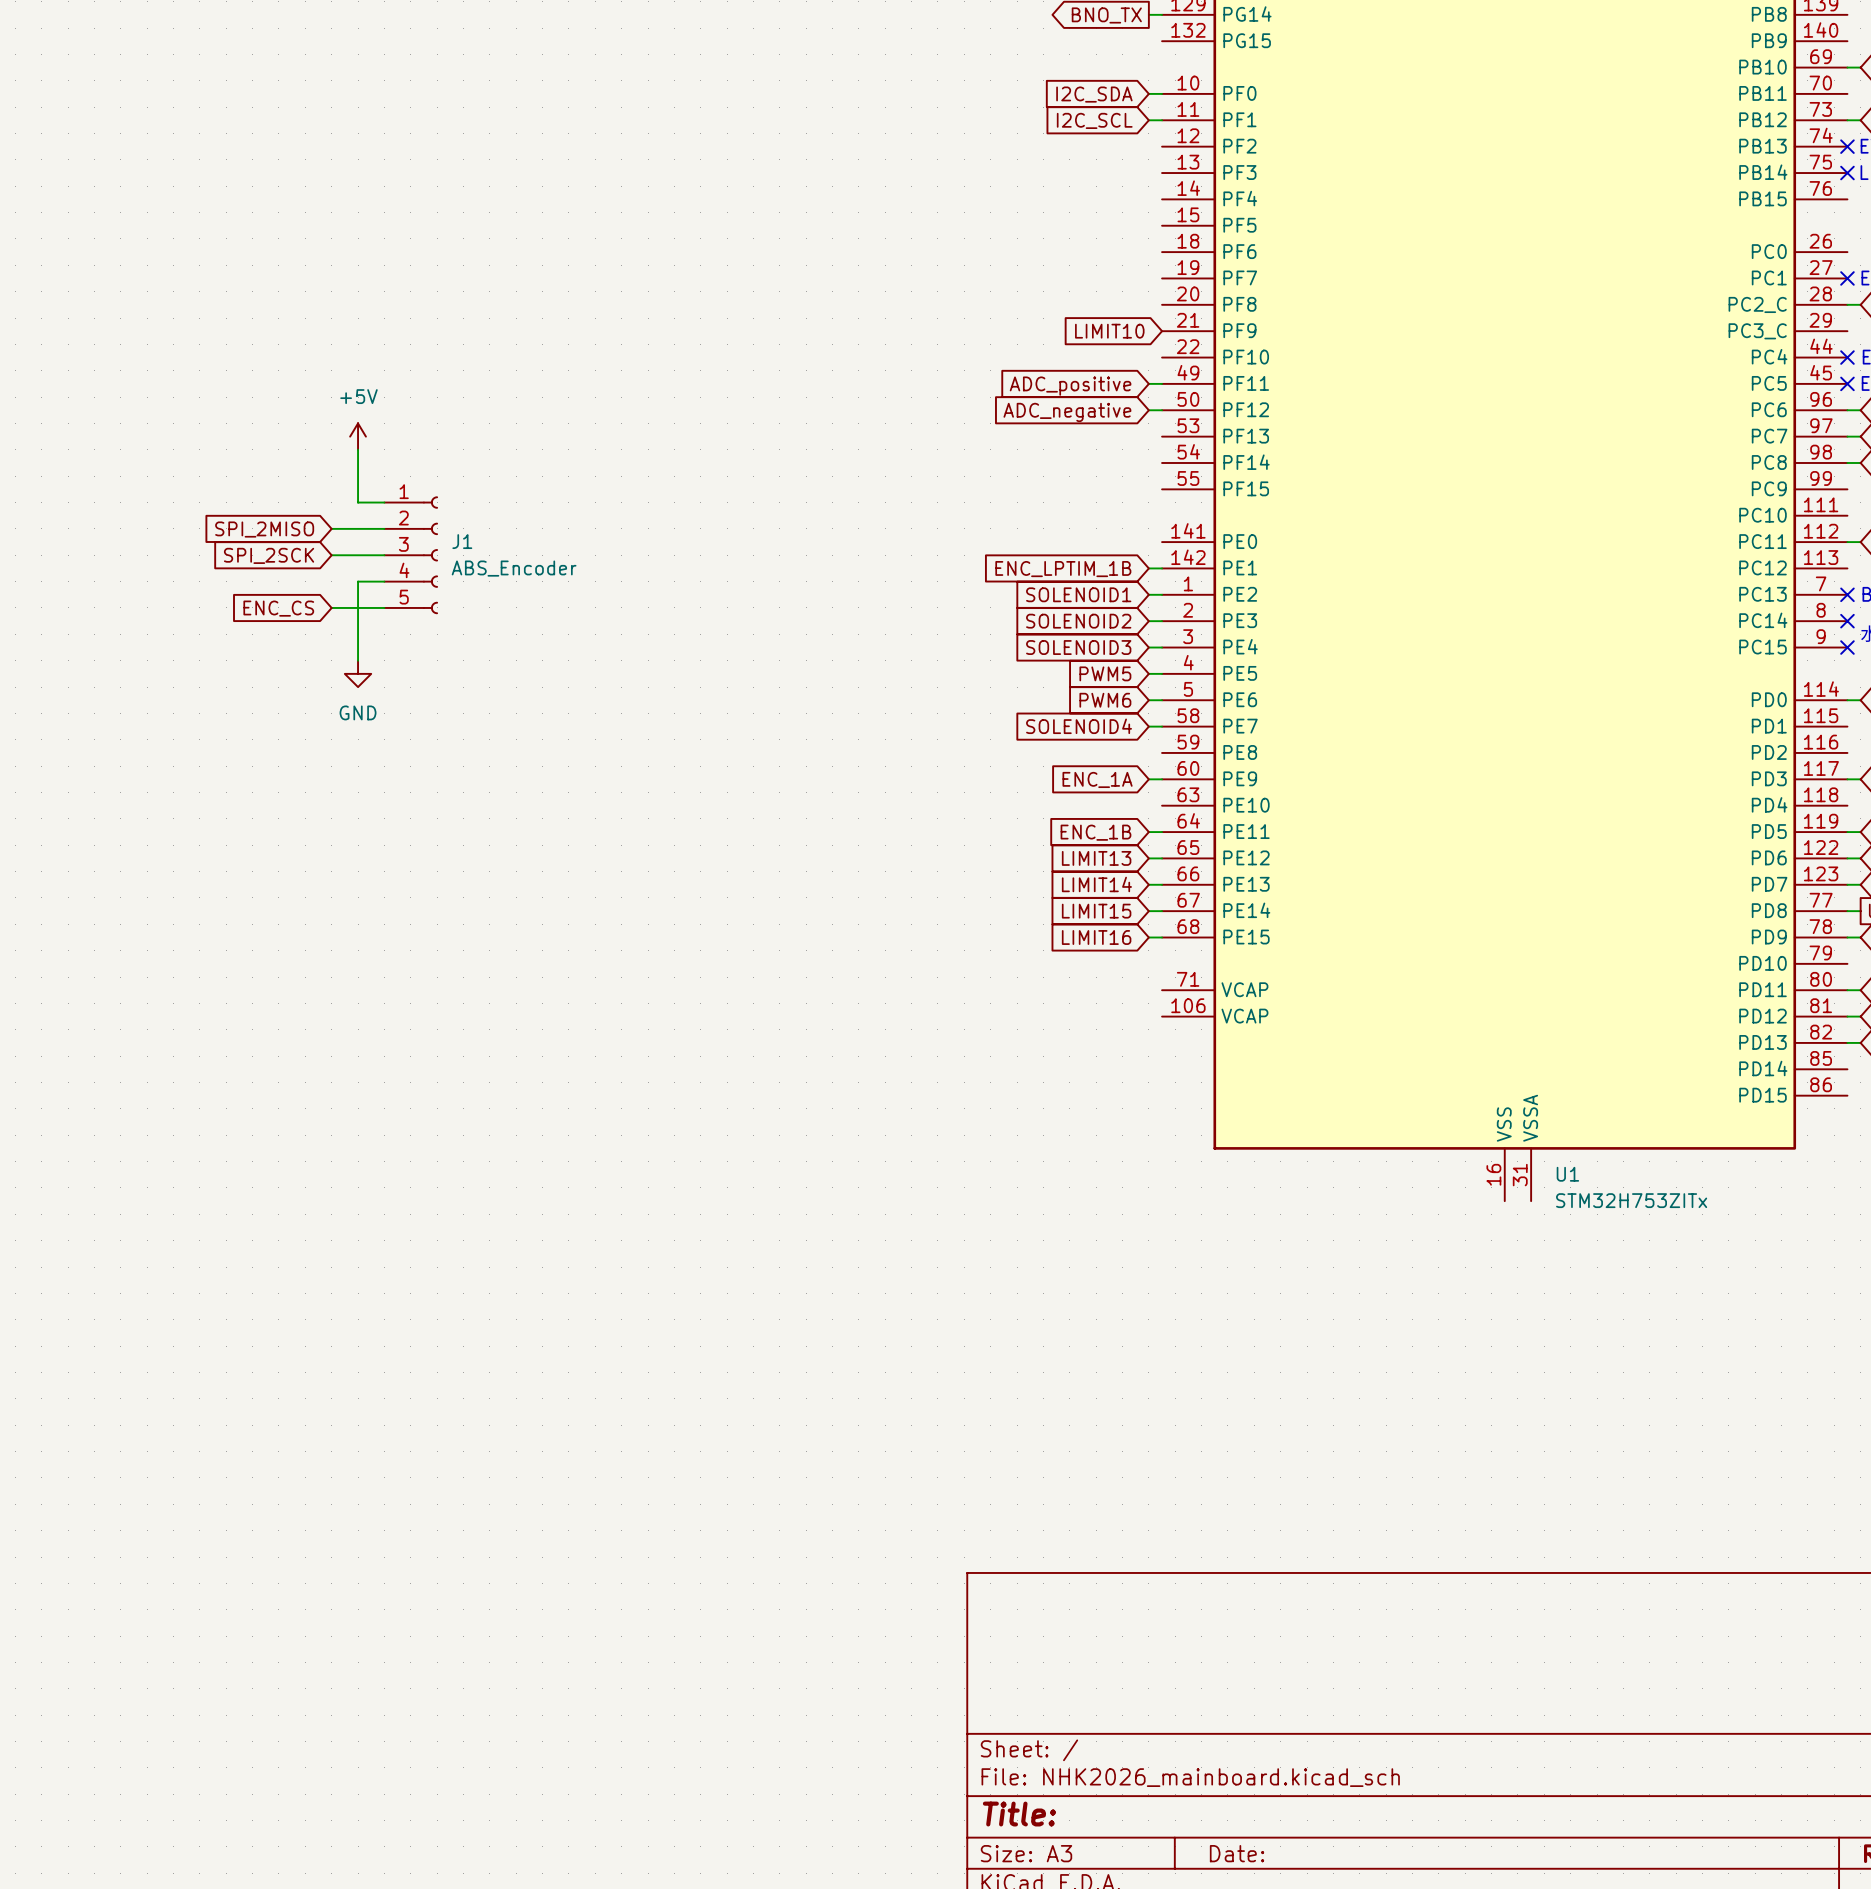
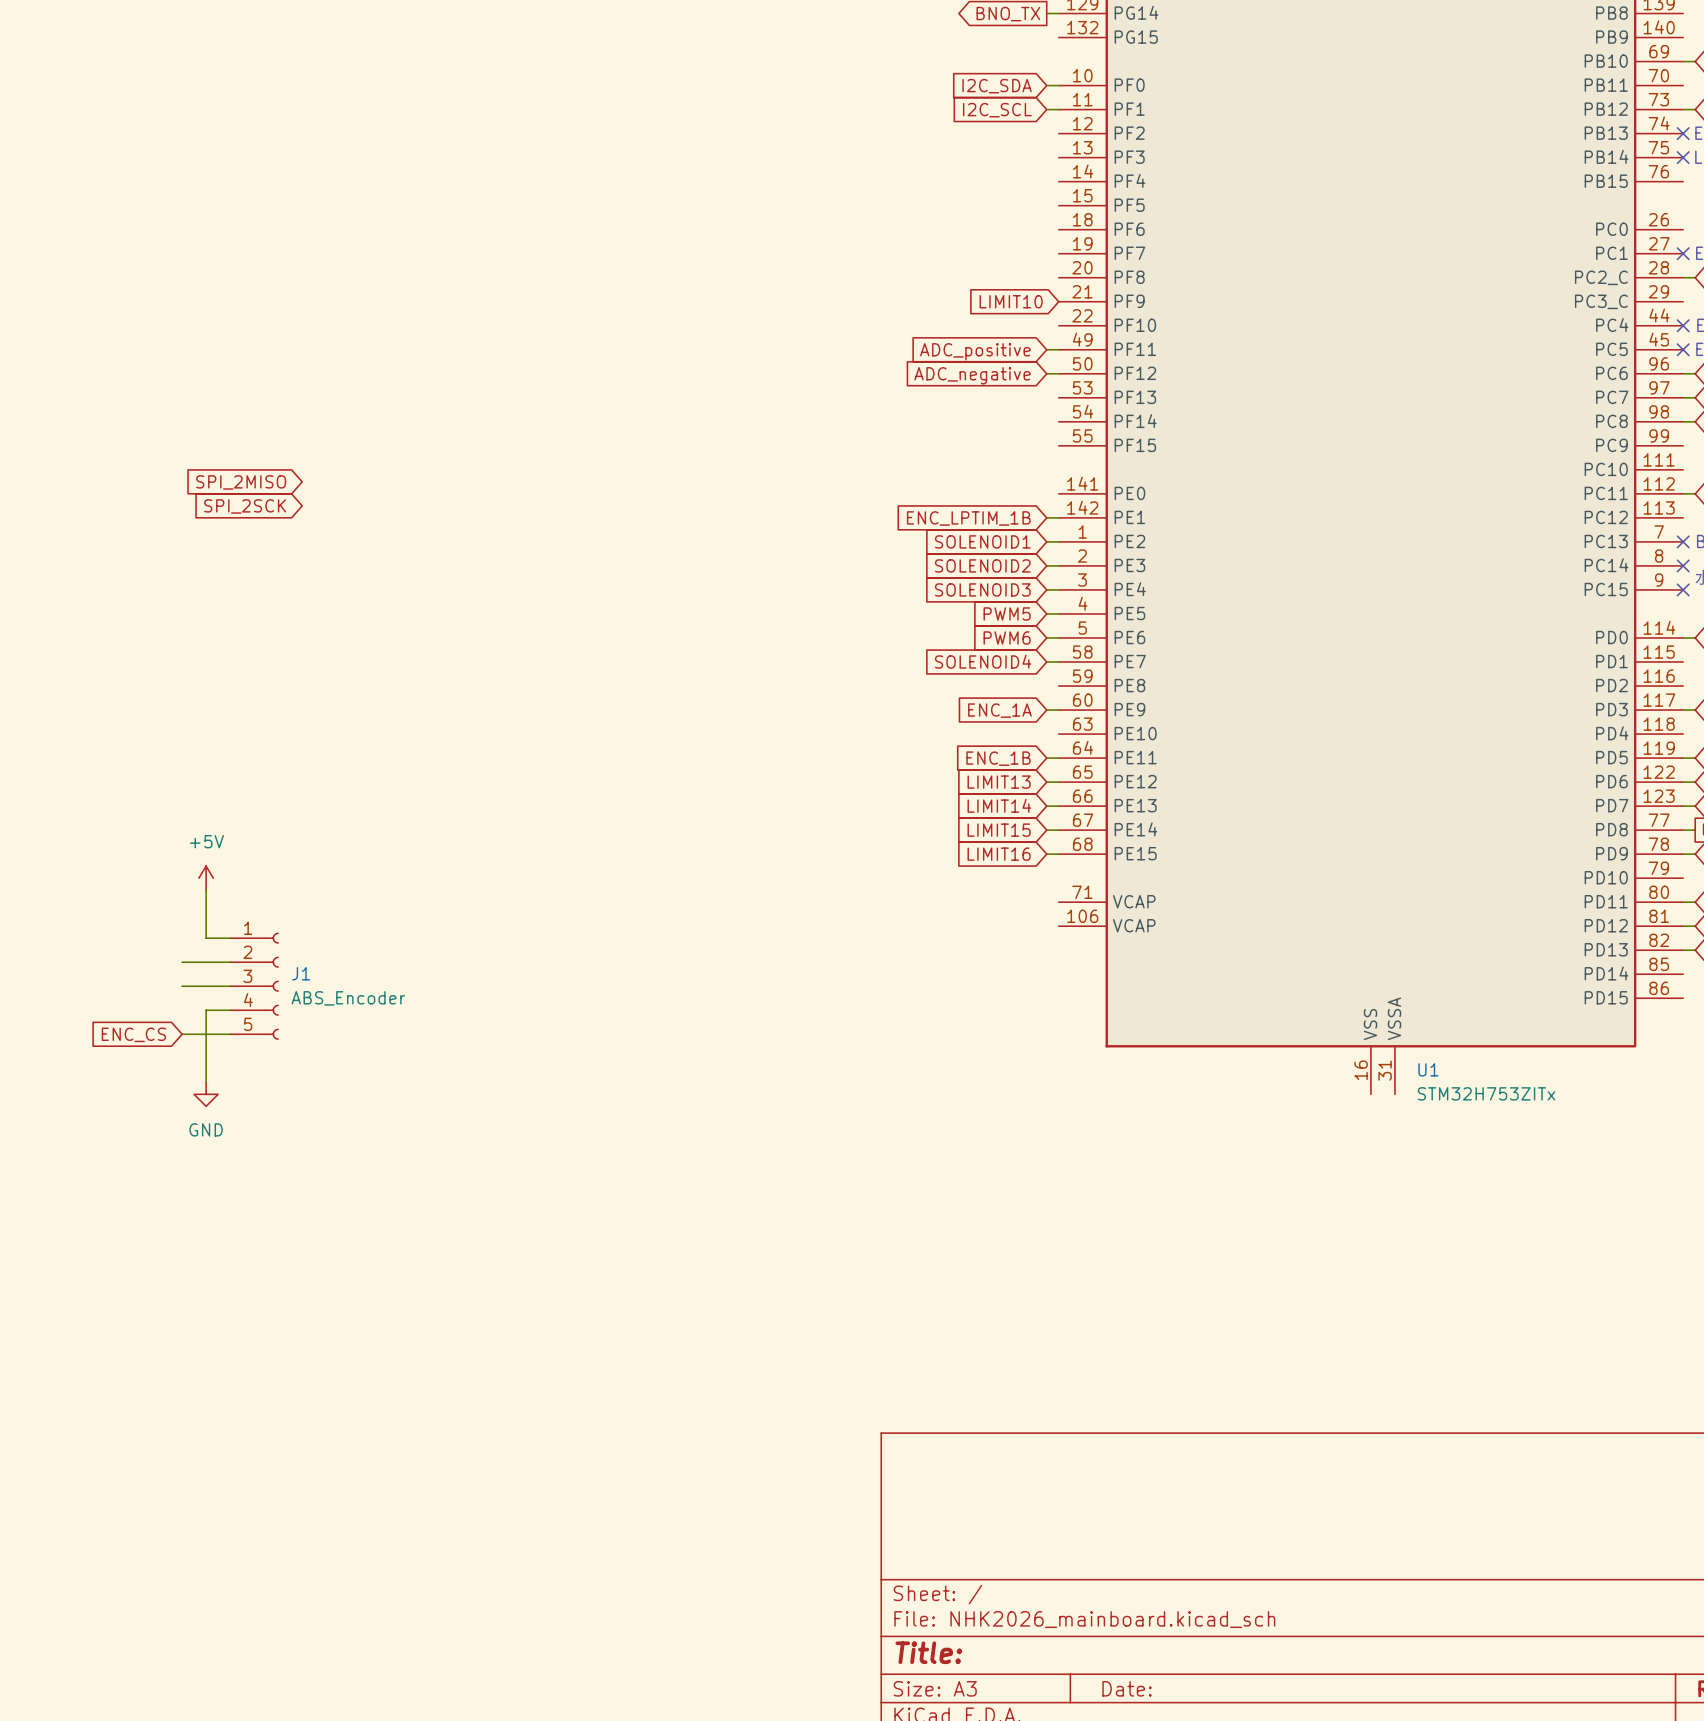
power symbol: +5V (358, 436) -> none
wire: (358, 449) (358, 502) (384, 502) -> none
wire: (331, 528) (384, 528) -> none
wire: (331, 555) (384, 555) -> none
J1 position: (411, 555) -> (254, 986)
wire: (384, 581) (358, 581) (358, 660) -> none
wire: (331, 607) (384, 607) -> none
global label: ENC_CS (278, 608) -> none
power symbol: GND (358, 673) -> none
power symbol: none -> +5V (206, 878)
wire: none -> (206, 890) (206, 938) (230, 938)
wire: none -> (182, 962) (230, 962)
wire: none -> (182, 986) (230, 986)
wire: none -> (230, 1010) (206, 1010) (206, 1082)
global label: none -> ENC_CS (133, 1034)
wire: none -> (182, 1034) (230, 1034)
power symbol: none -> GND (206, 1094)

